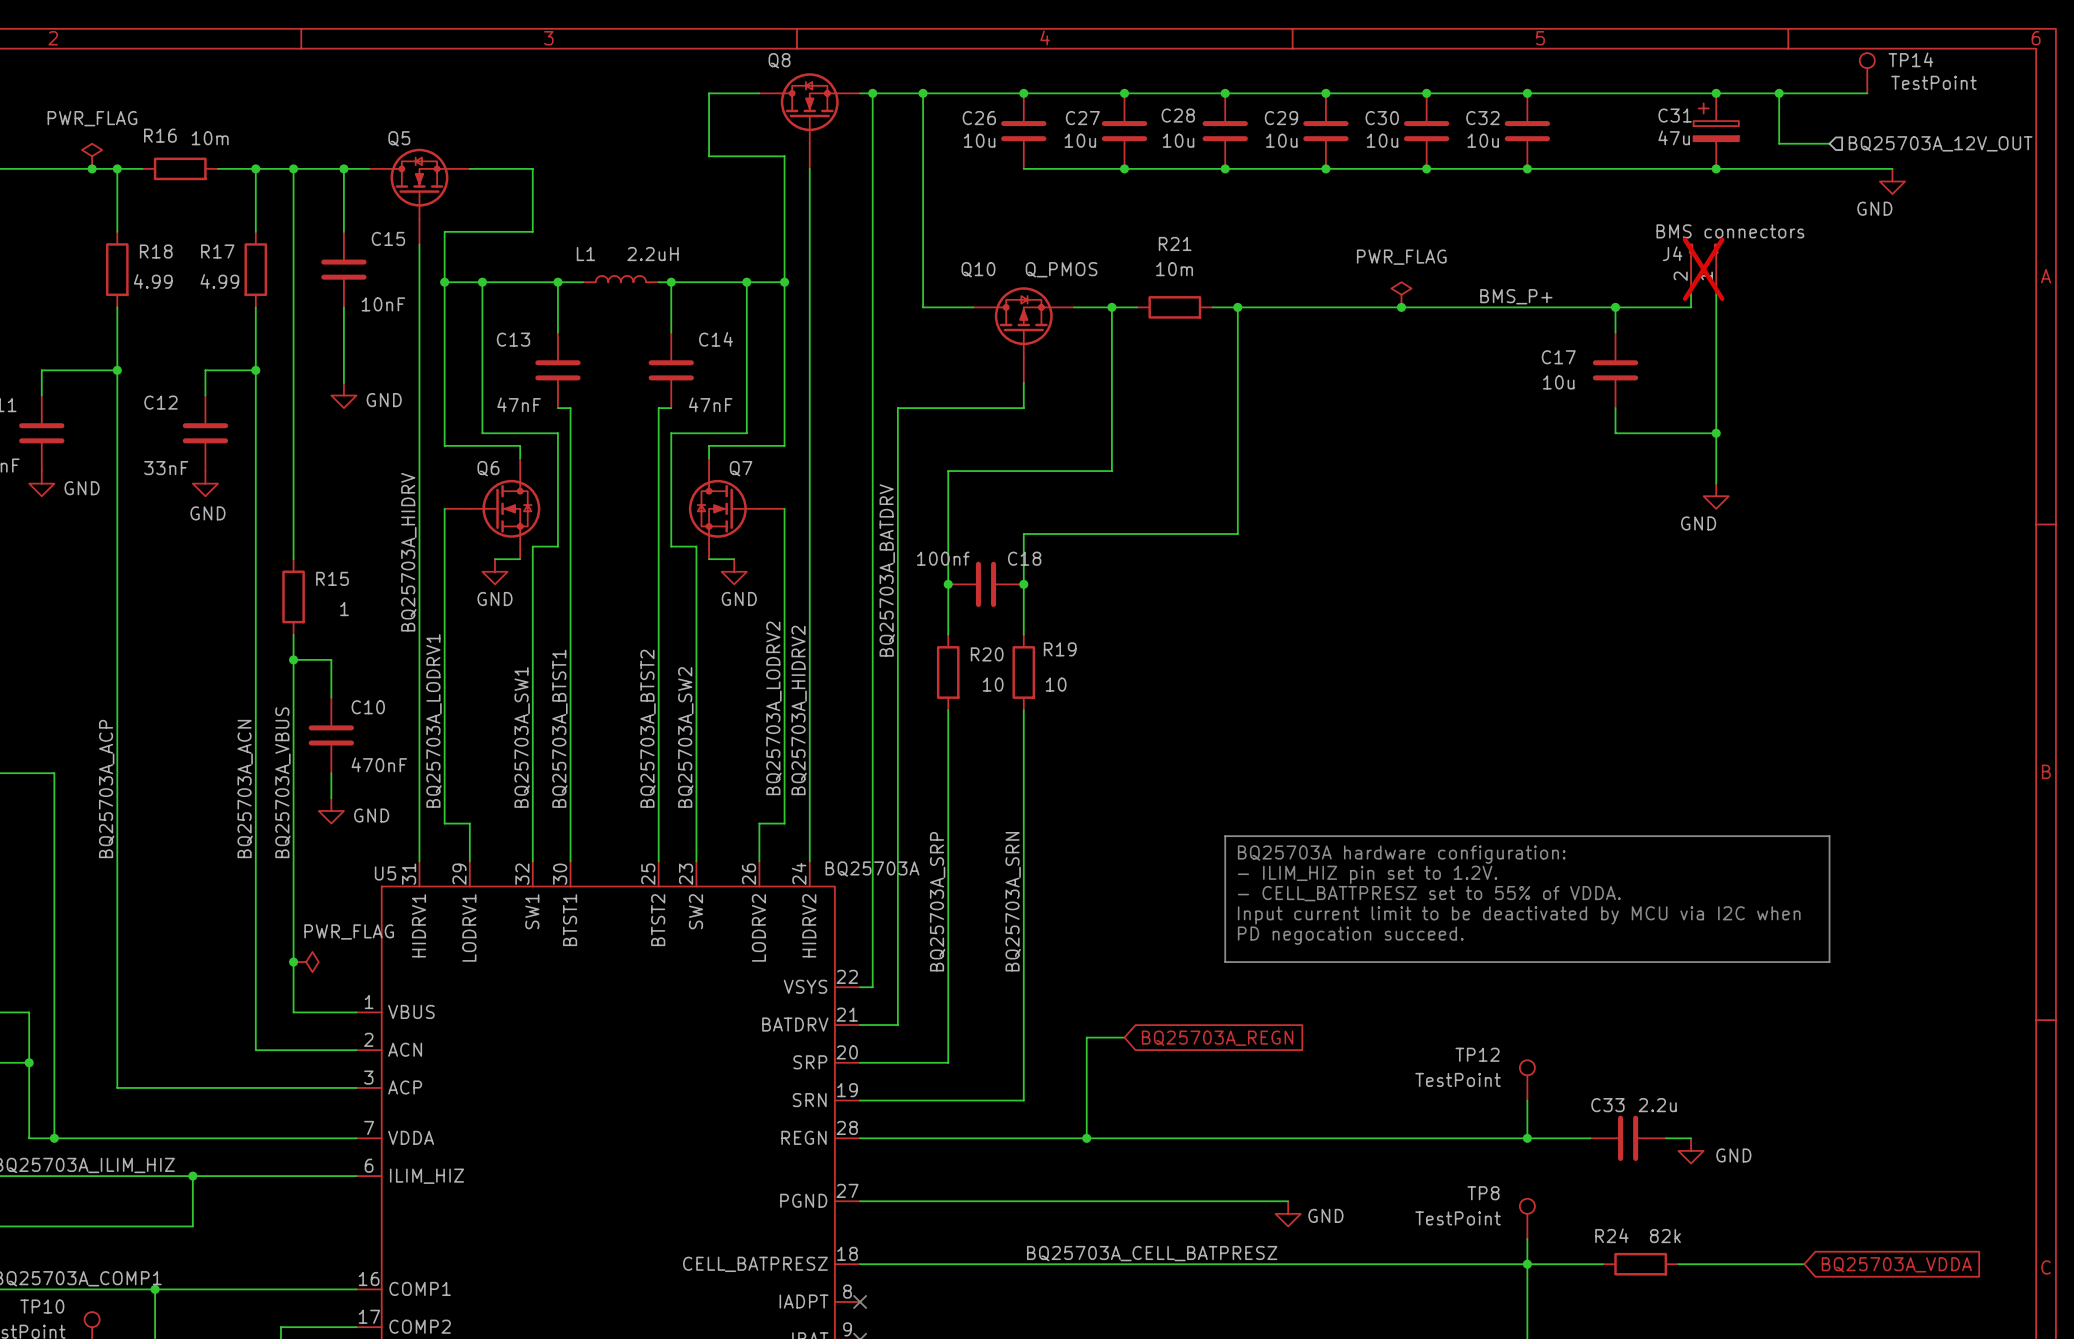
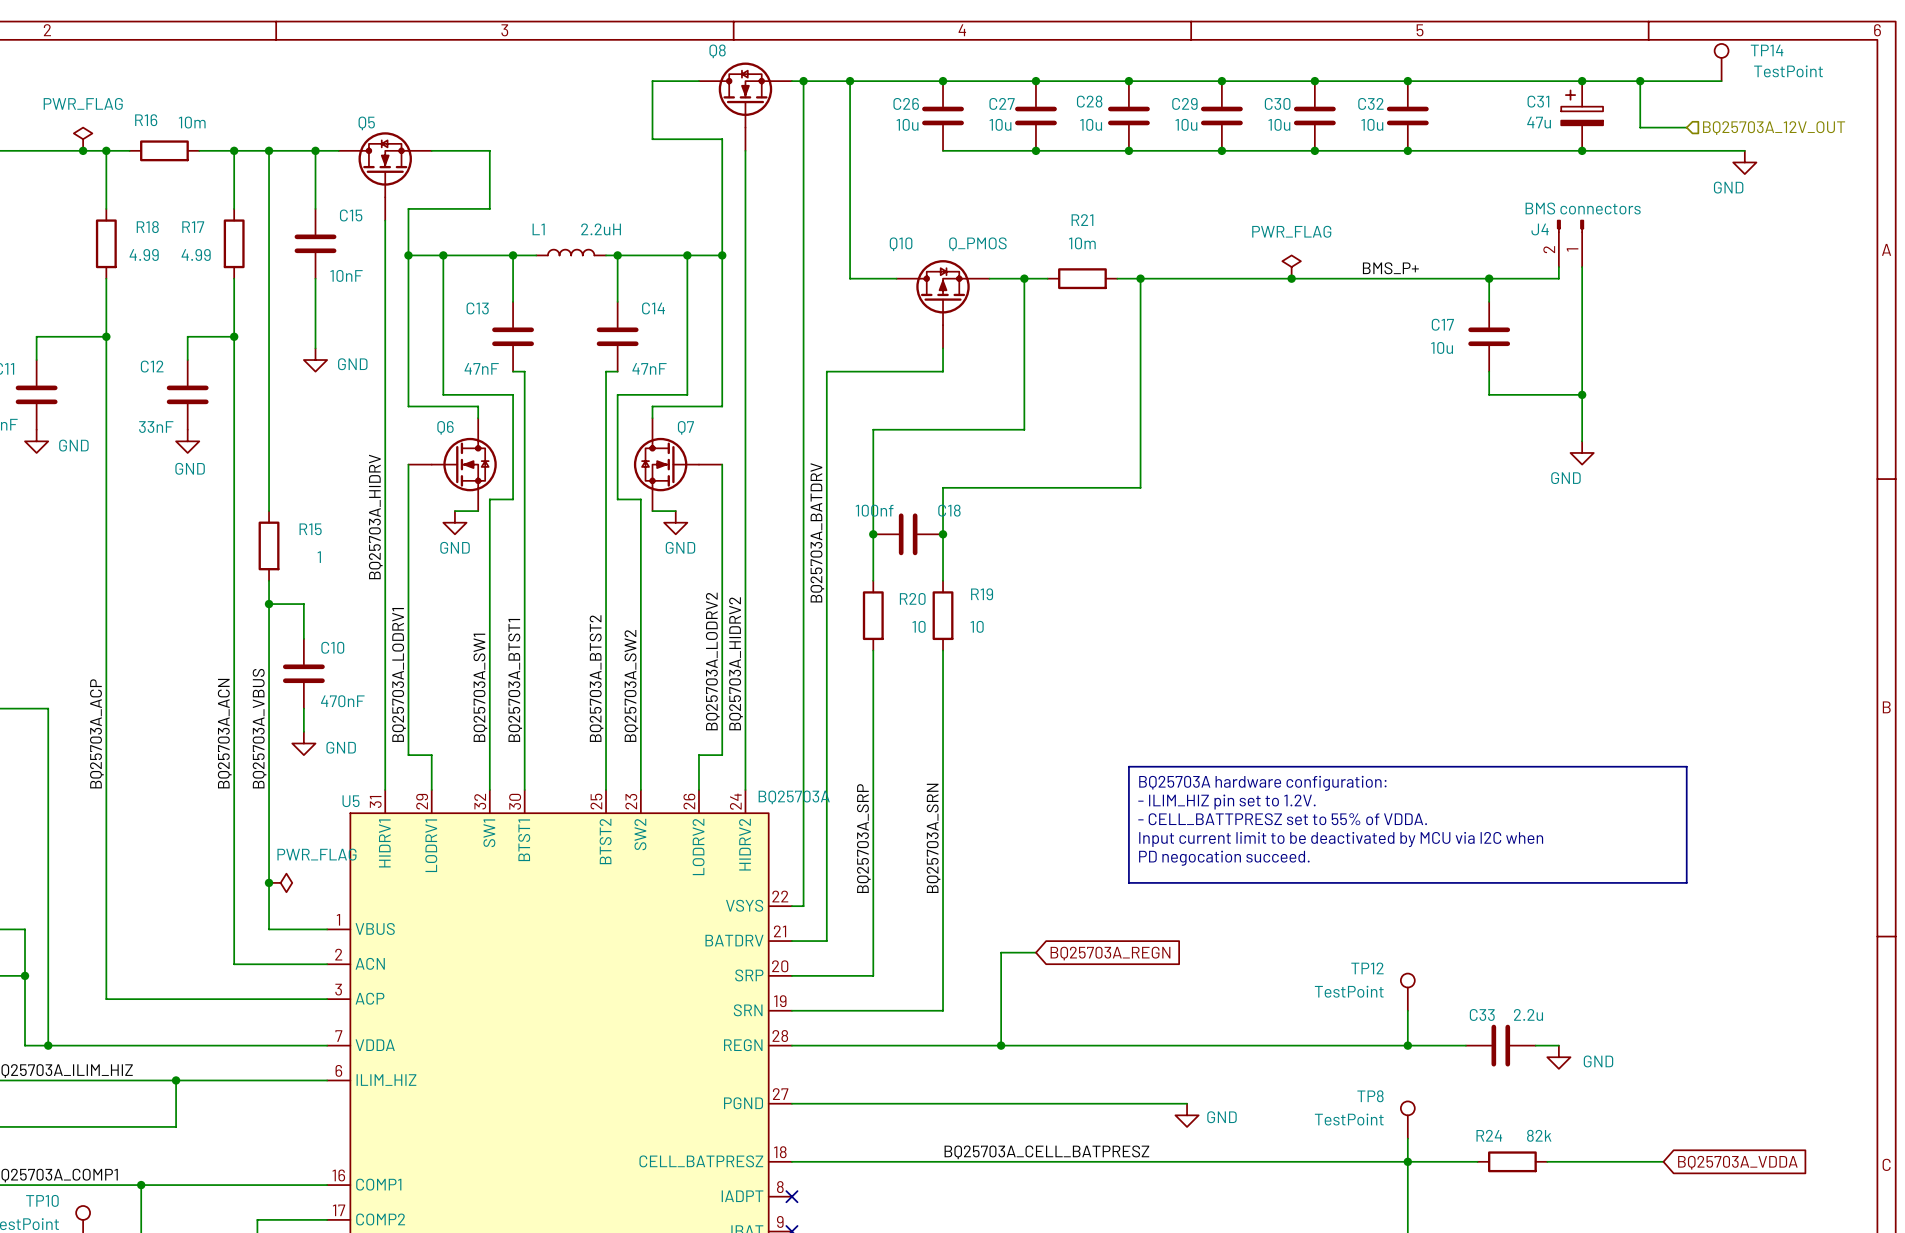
J4 do-not-place cross: (1703, 269) -> none

